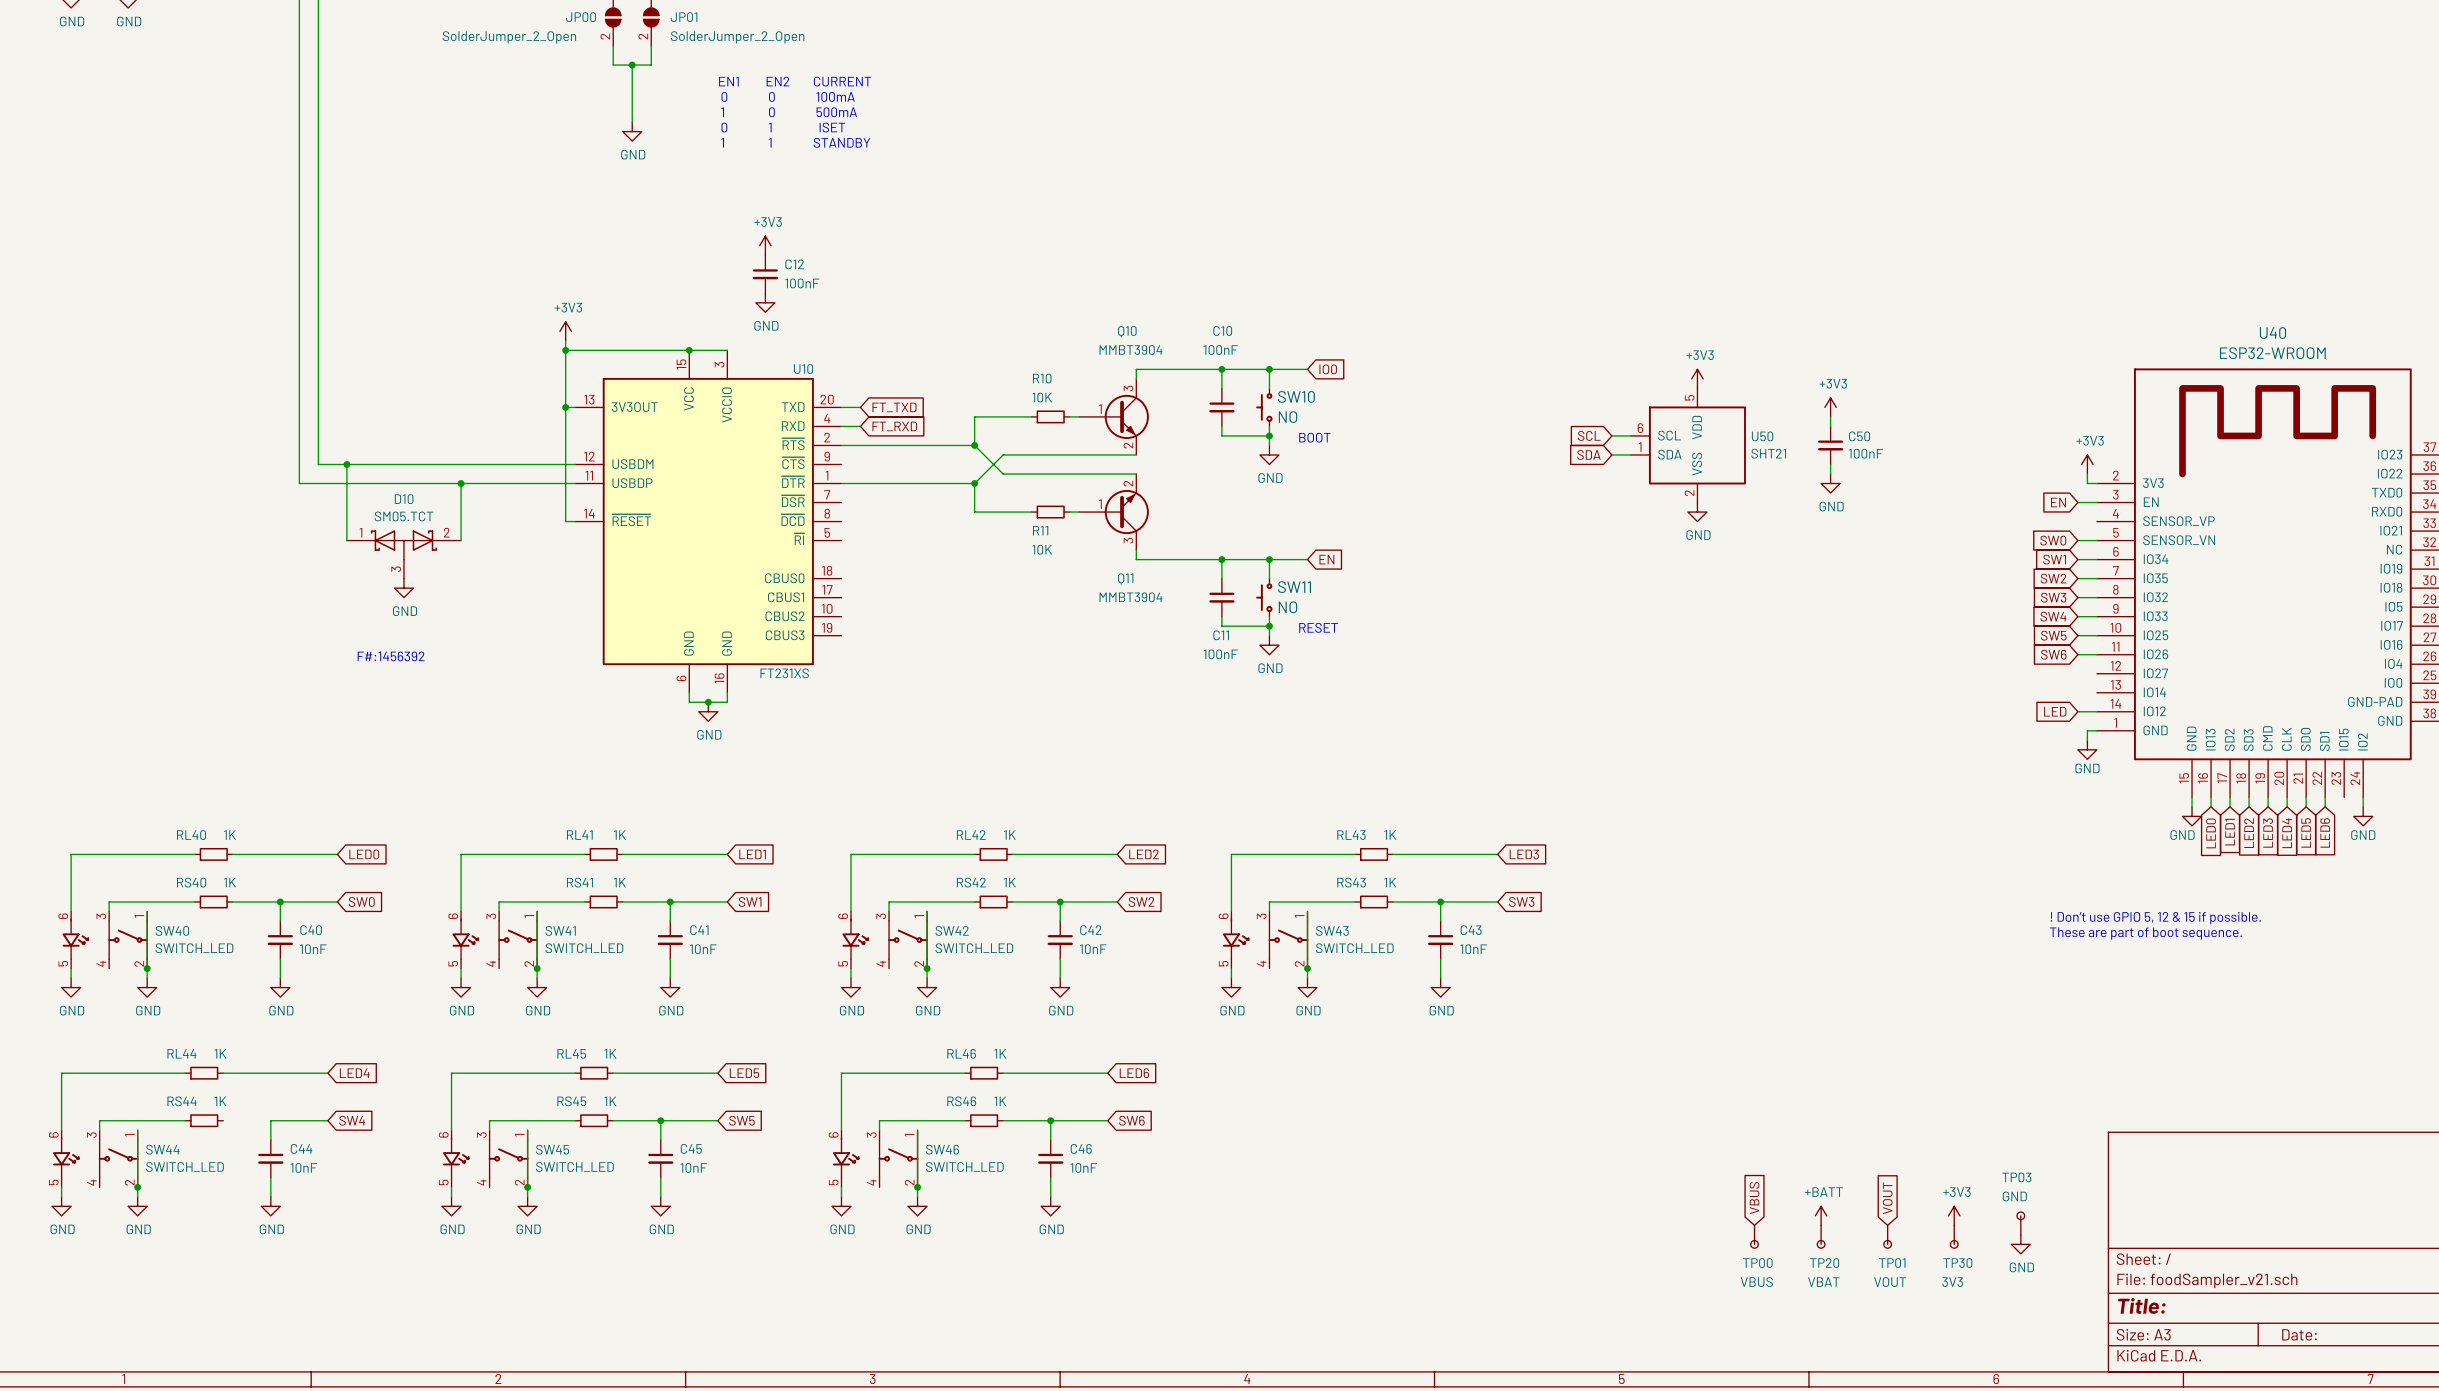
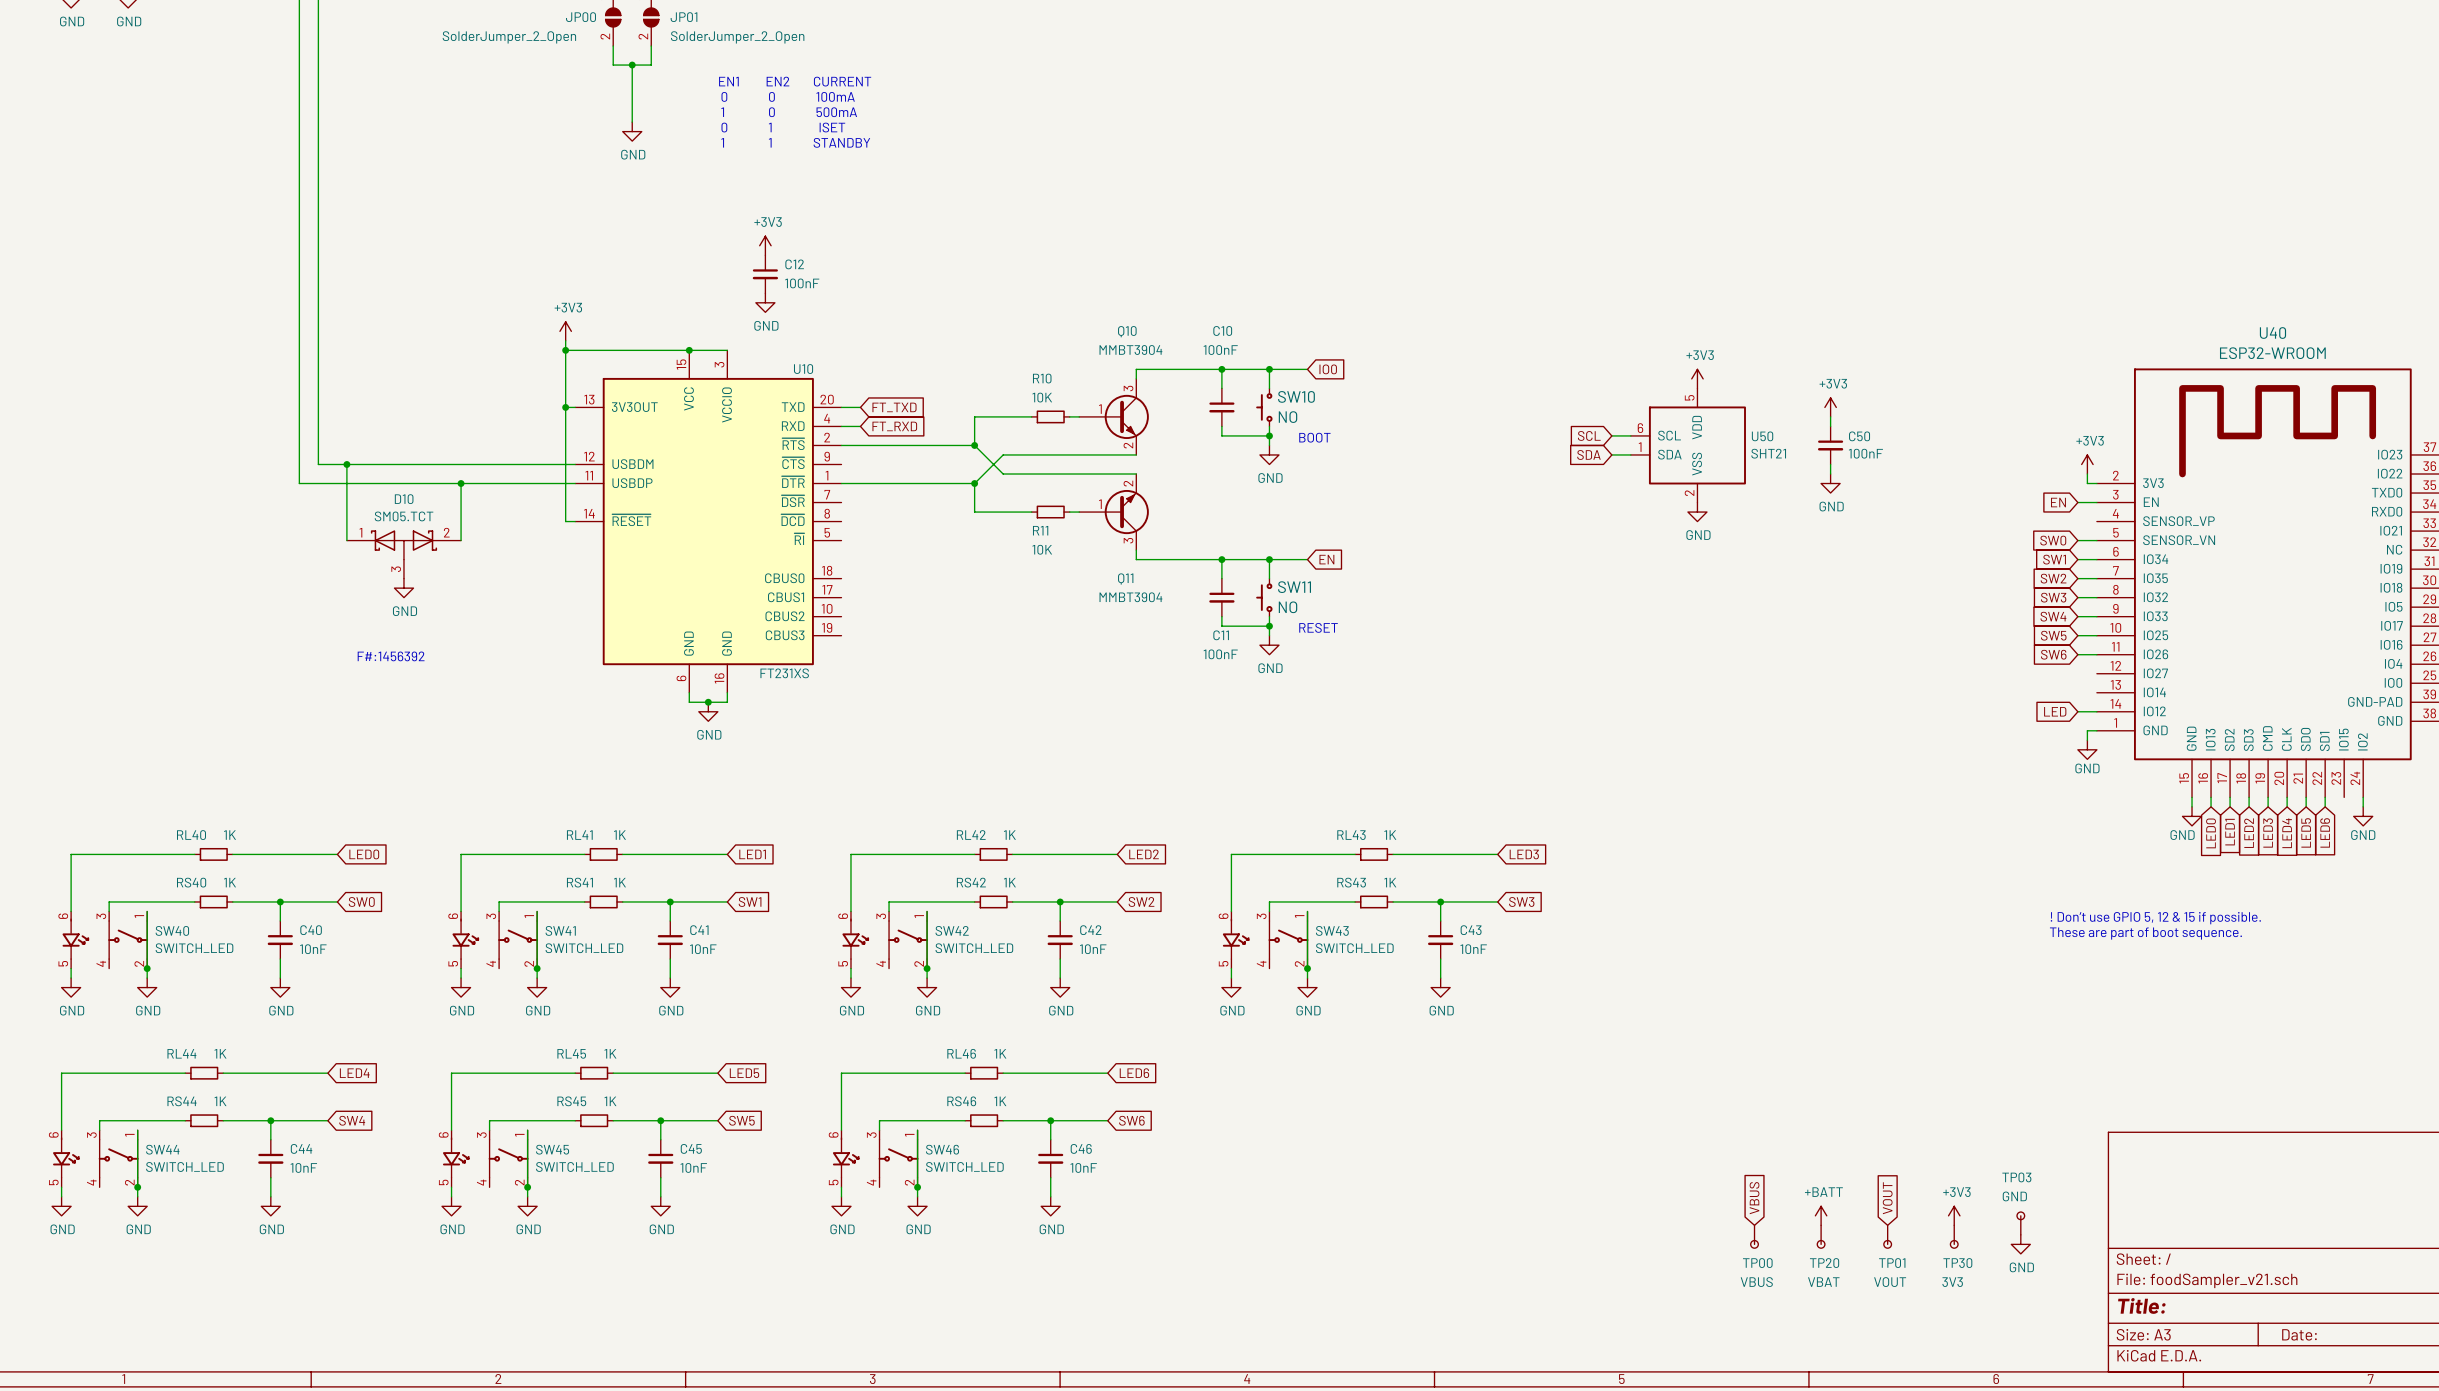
wire: none -> (223, 1120) (270, 1120)
junction: none -> (270, 1120)

